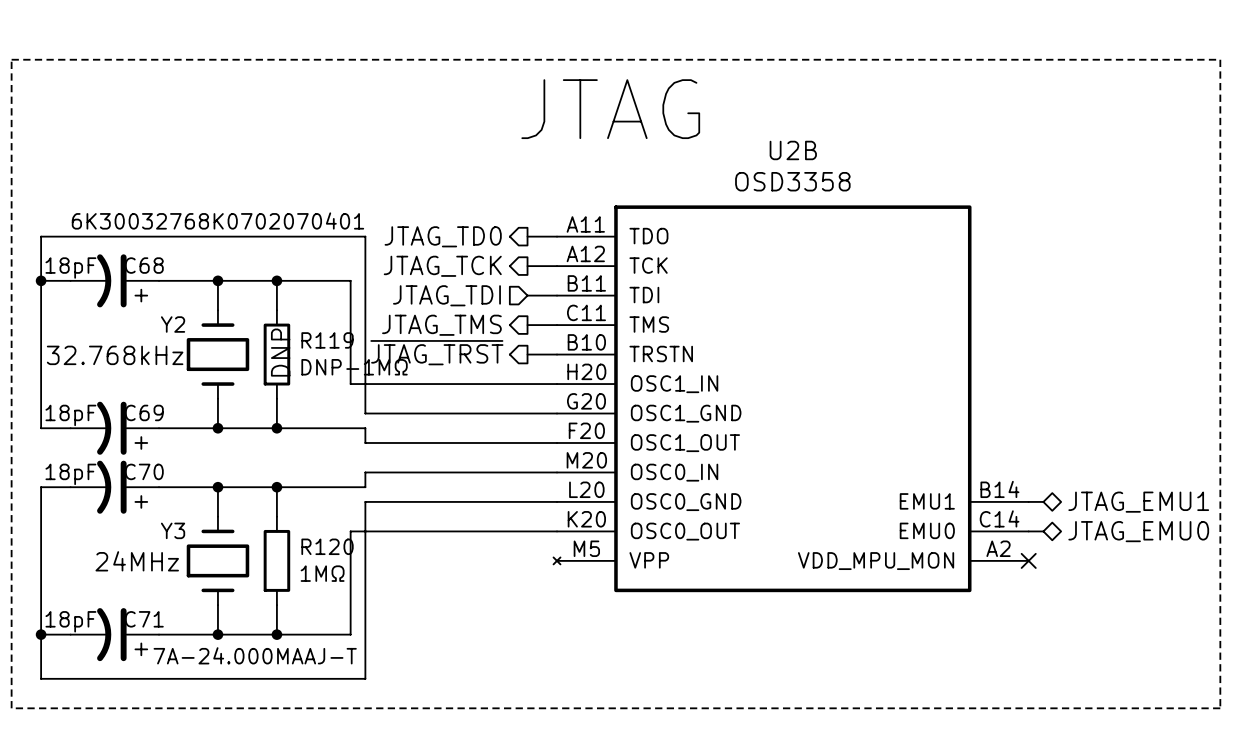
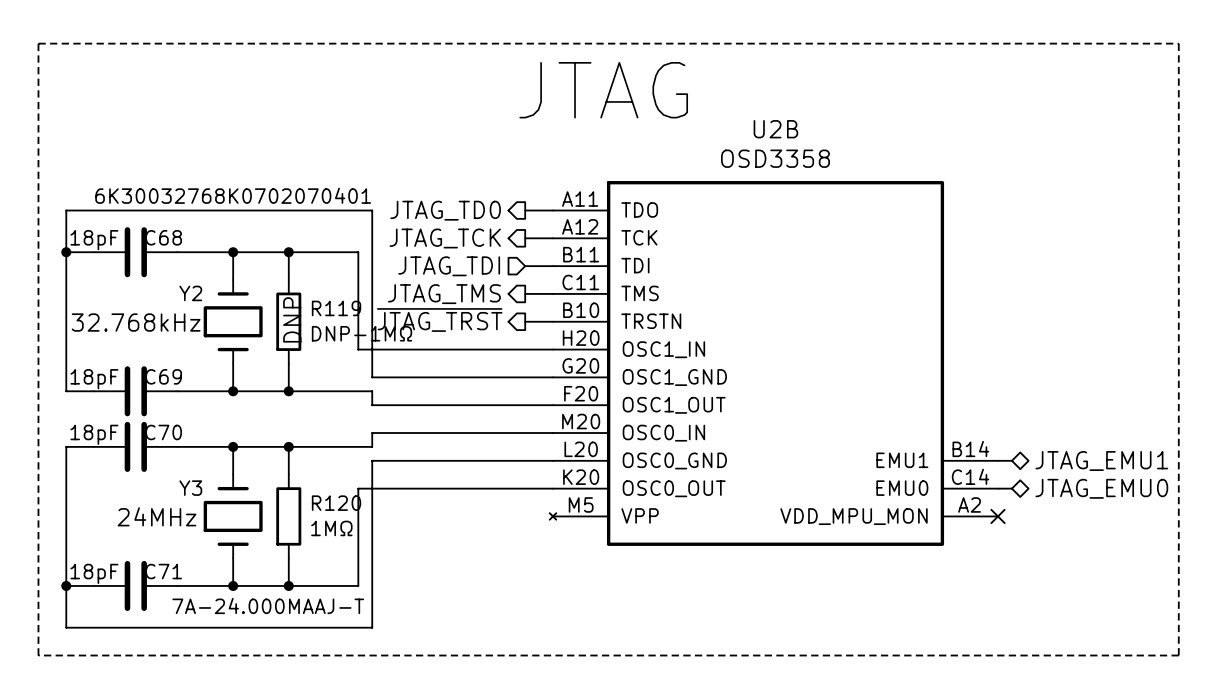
C68 symbol: [70, 254, 160, 308] -> [94, 227, 178, 278]
C69 symbol: [70, 401, 160, 455] -> [94, 366, 178, 417]
C70 symbol: [70, 460, 160, 514] -> [94, 421, 178, 472]
C71 symbol: [70, 608, 160, 662] -> [94, 560, 178, 612]

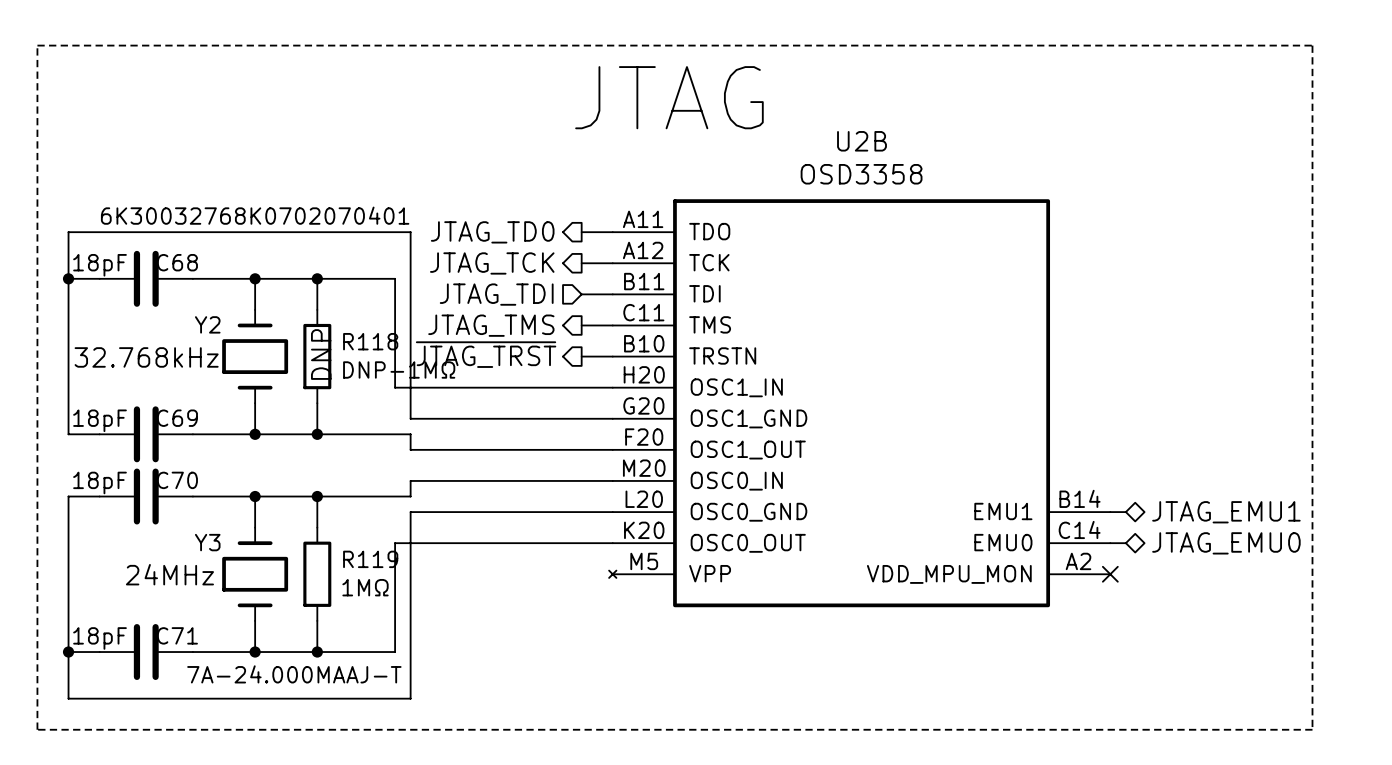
R119 name: R119 (336, 308) -> R118 (370, 341)
R120 name: R120 (336, 503) -> R119 (370, 559)

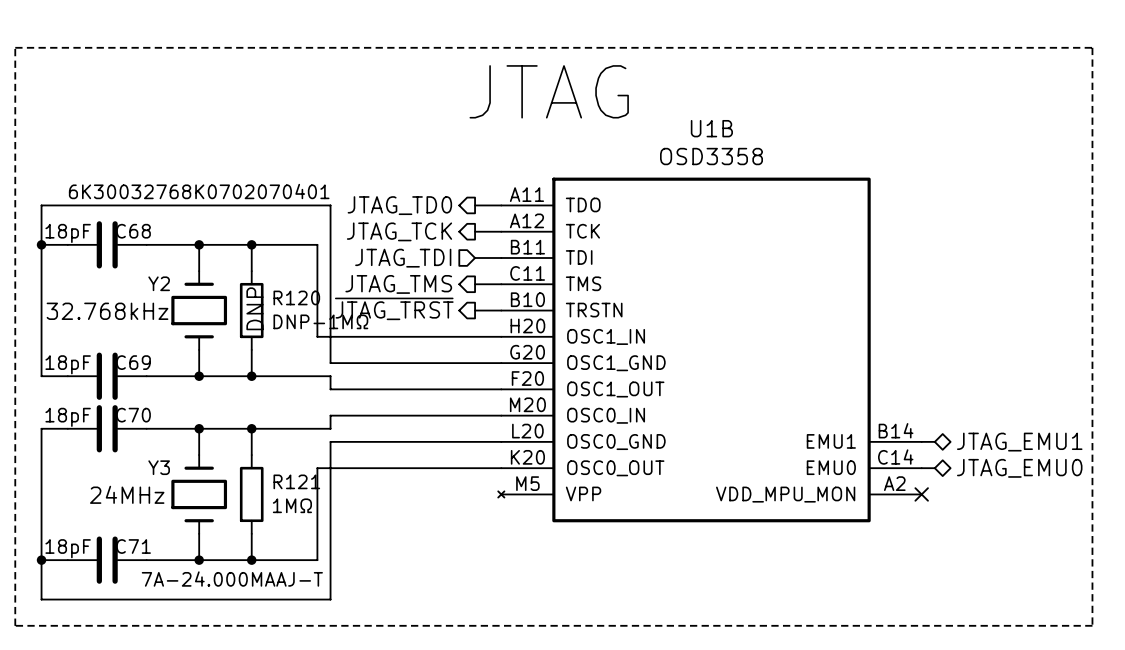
U2B name: U2B (862, 141) -> U1B (711, 128)
R118 name: R118 (370, 341) -> R120 (296, 297)
R119 name: R119 (370, 559) -> R121 (296, 481)

